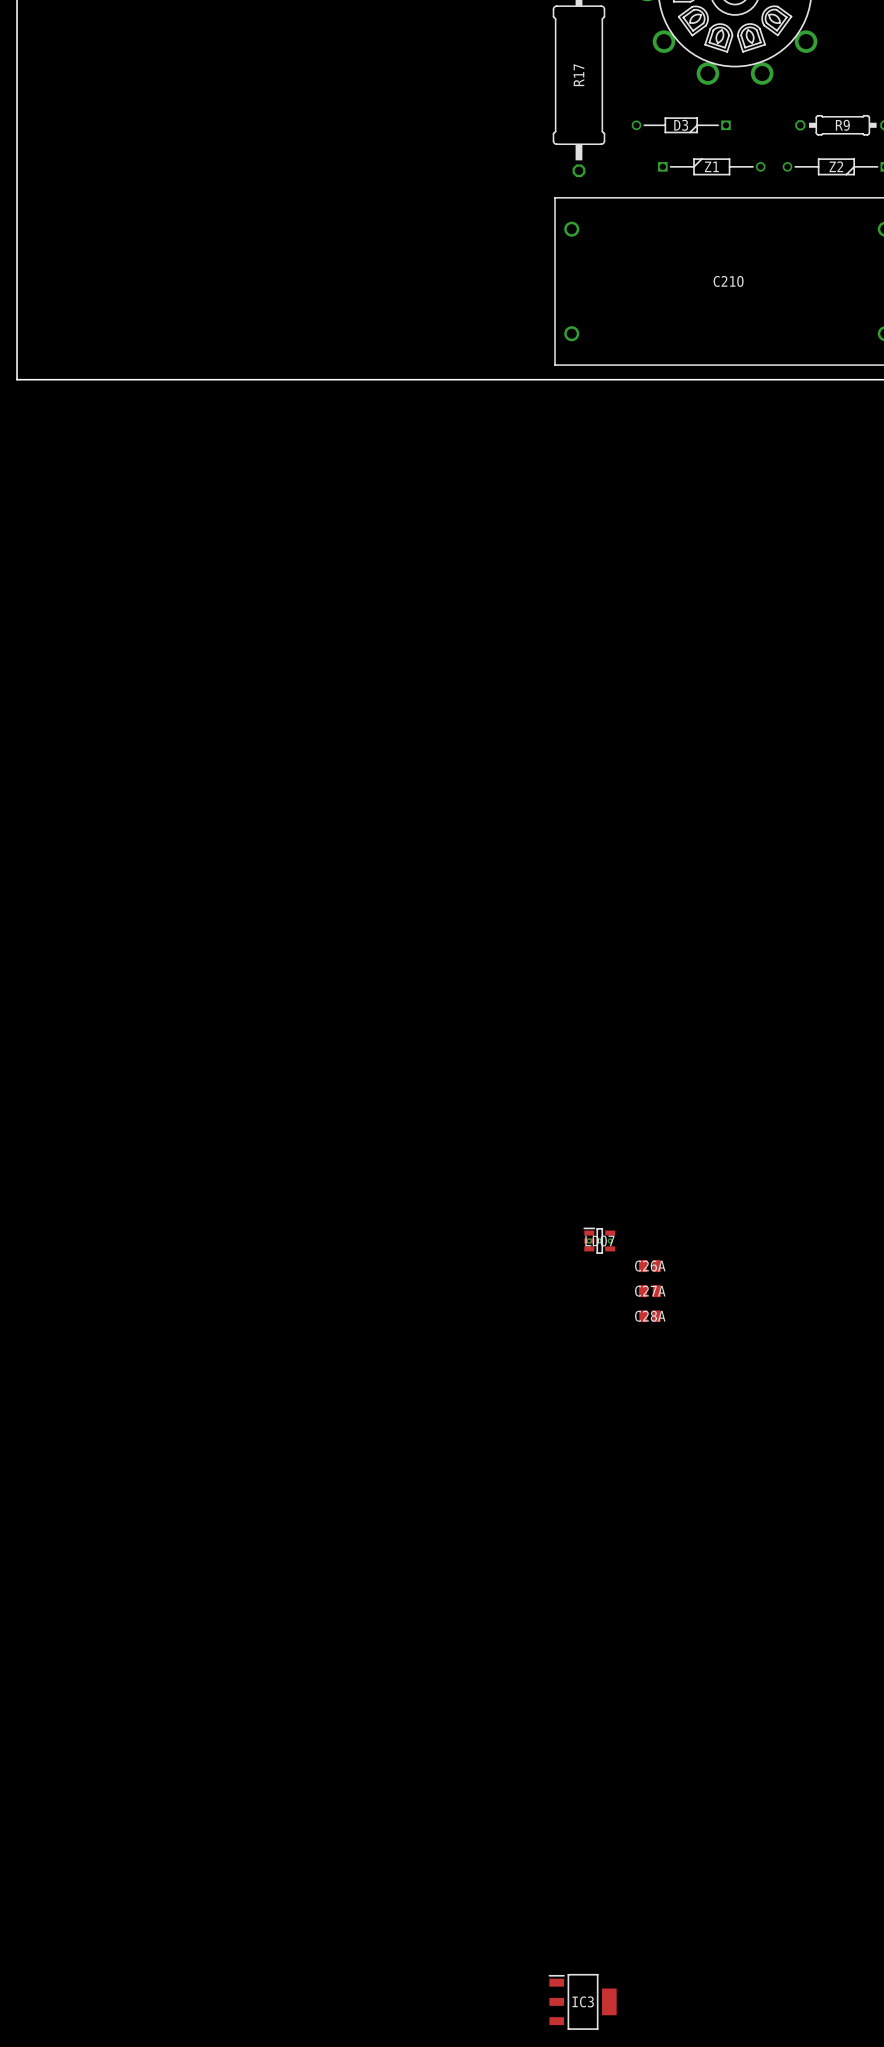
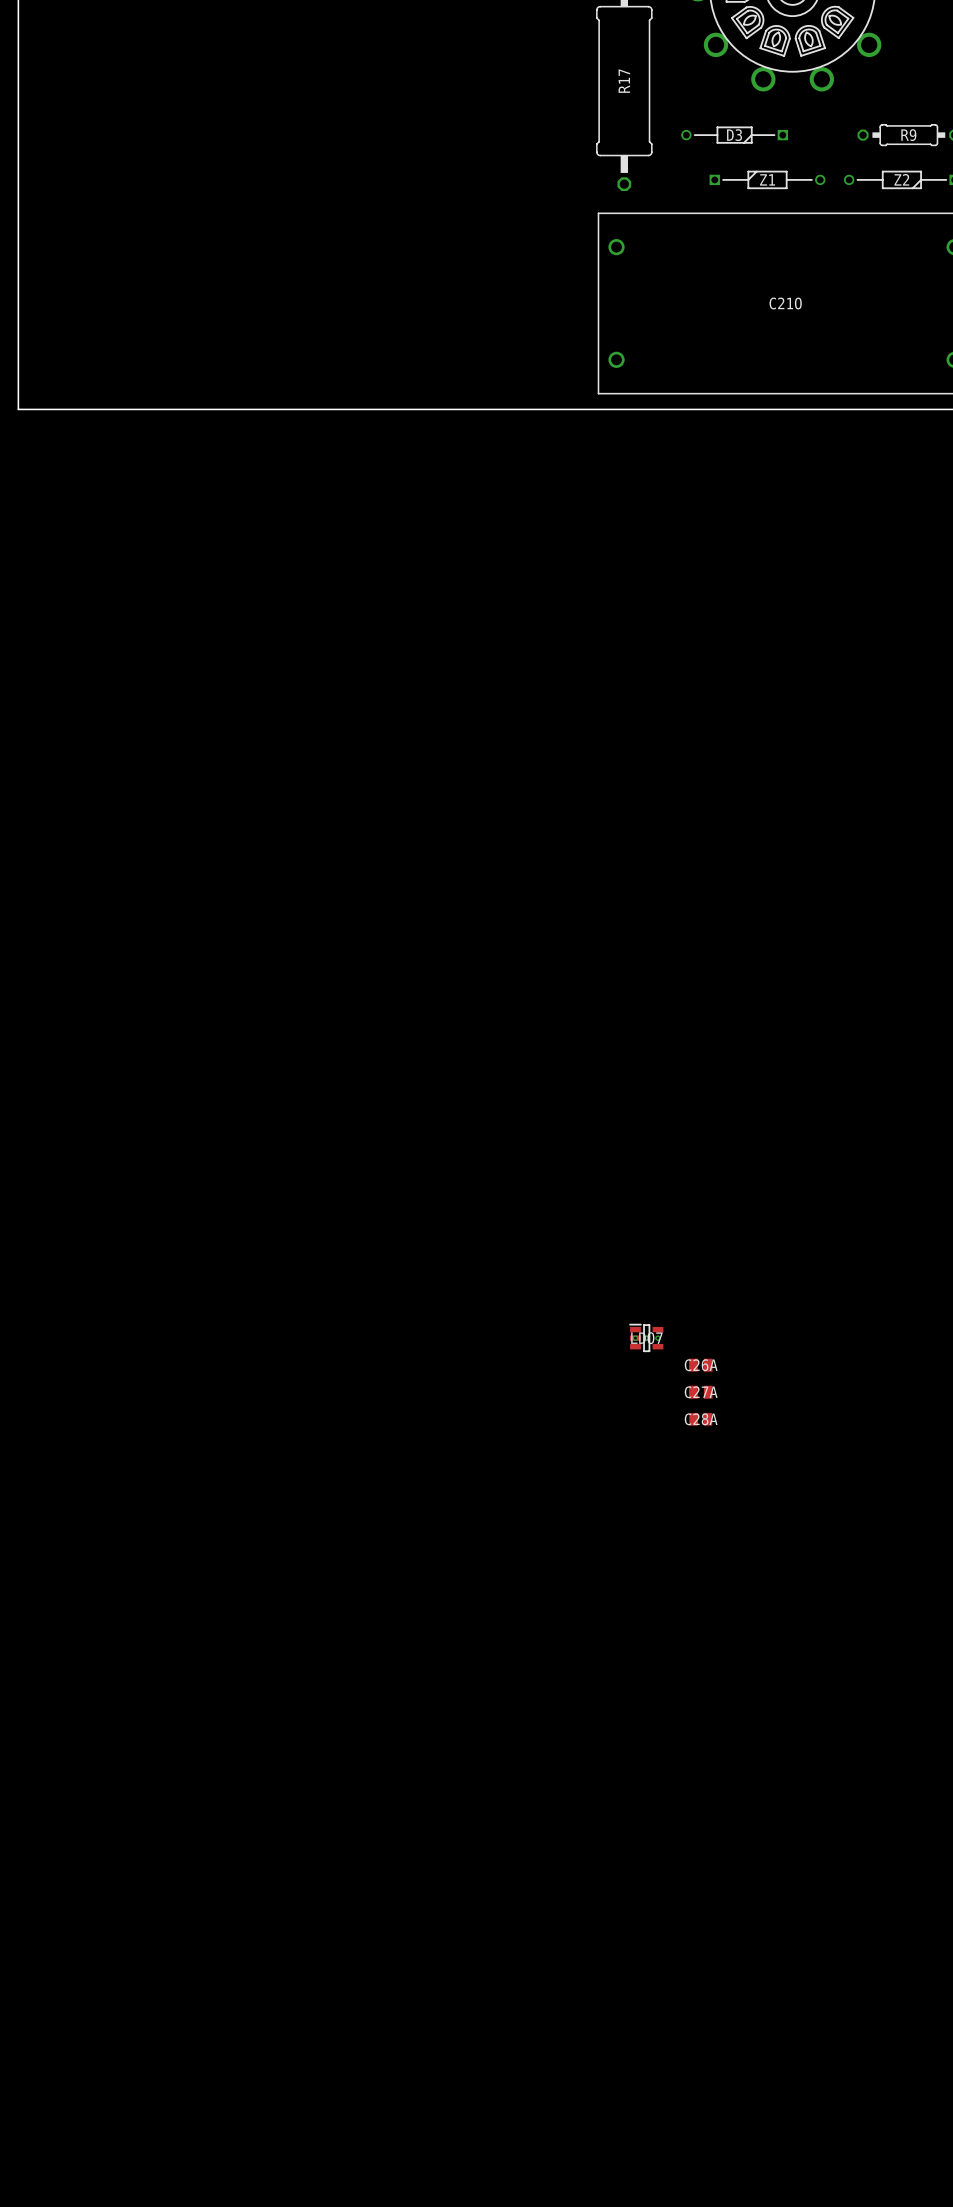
IC3: (582, 2001) -> none

